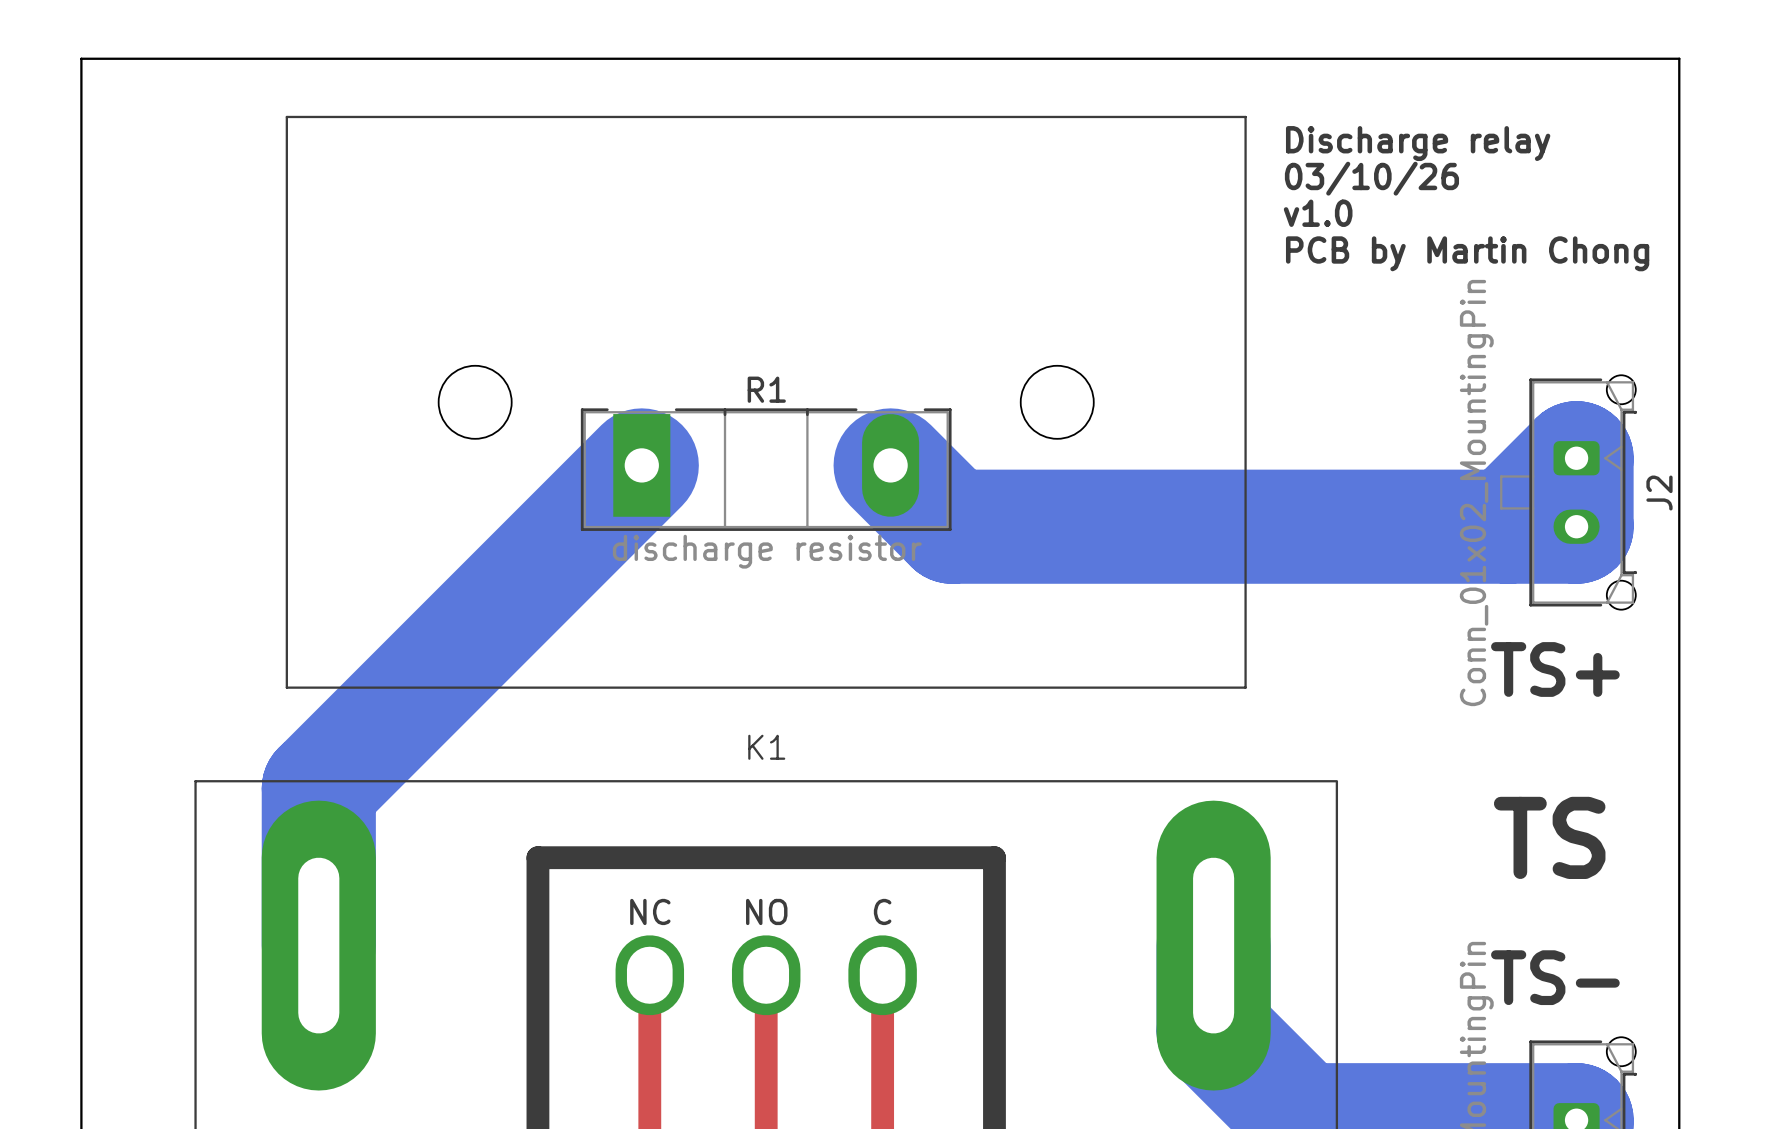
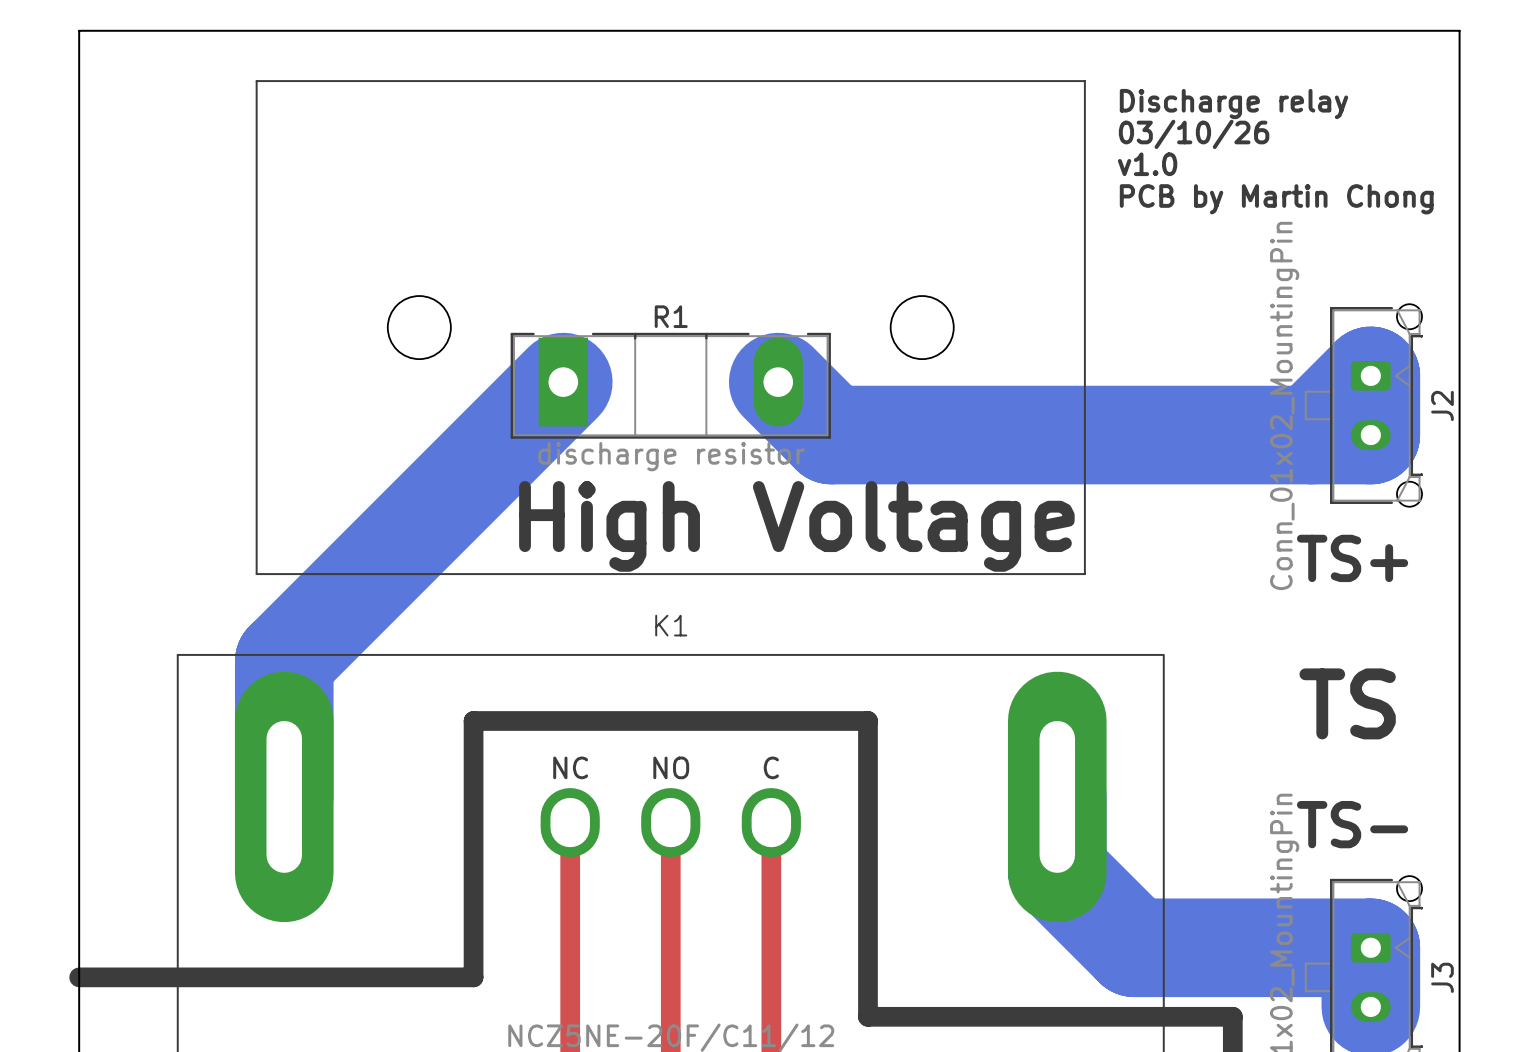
text: none -> High Voltage (796, 526)

